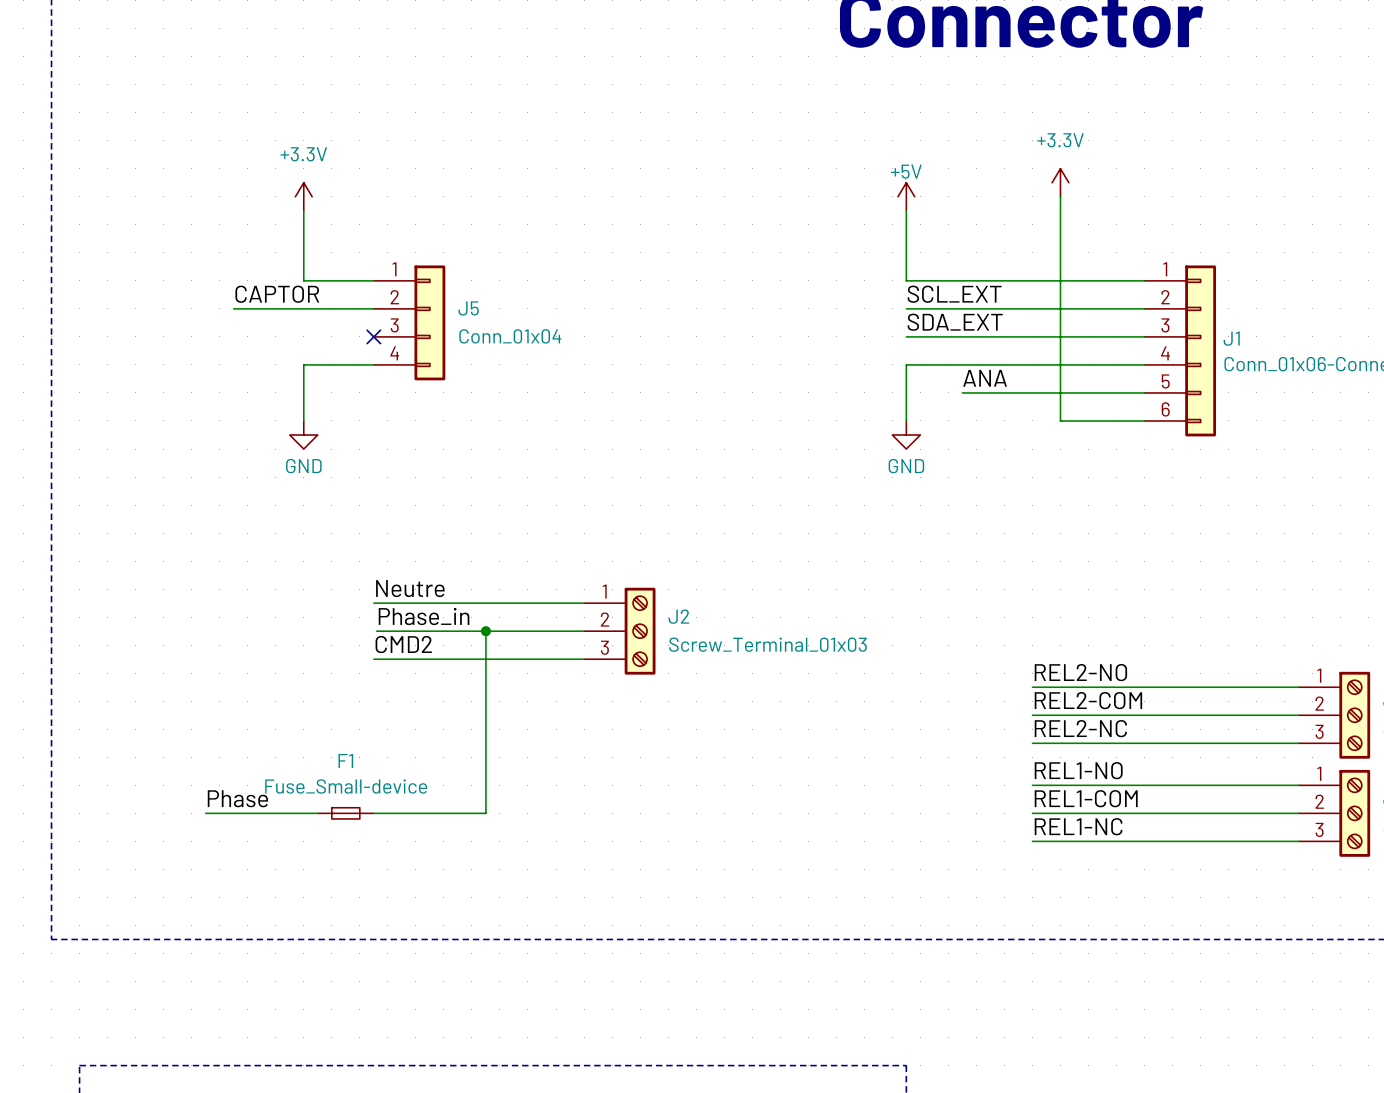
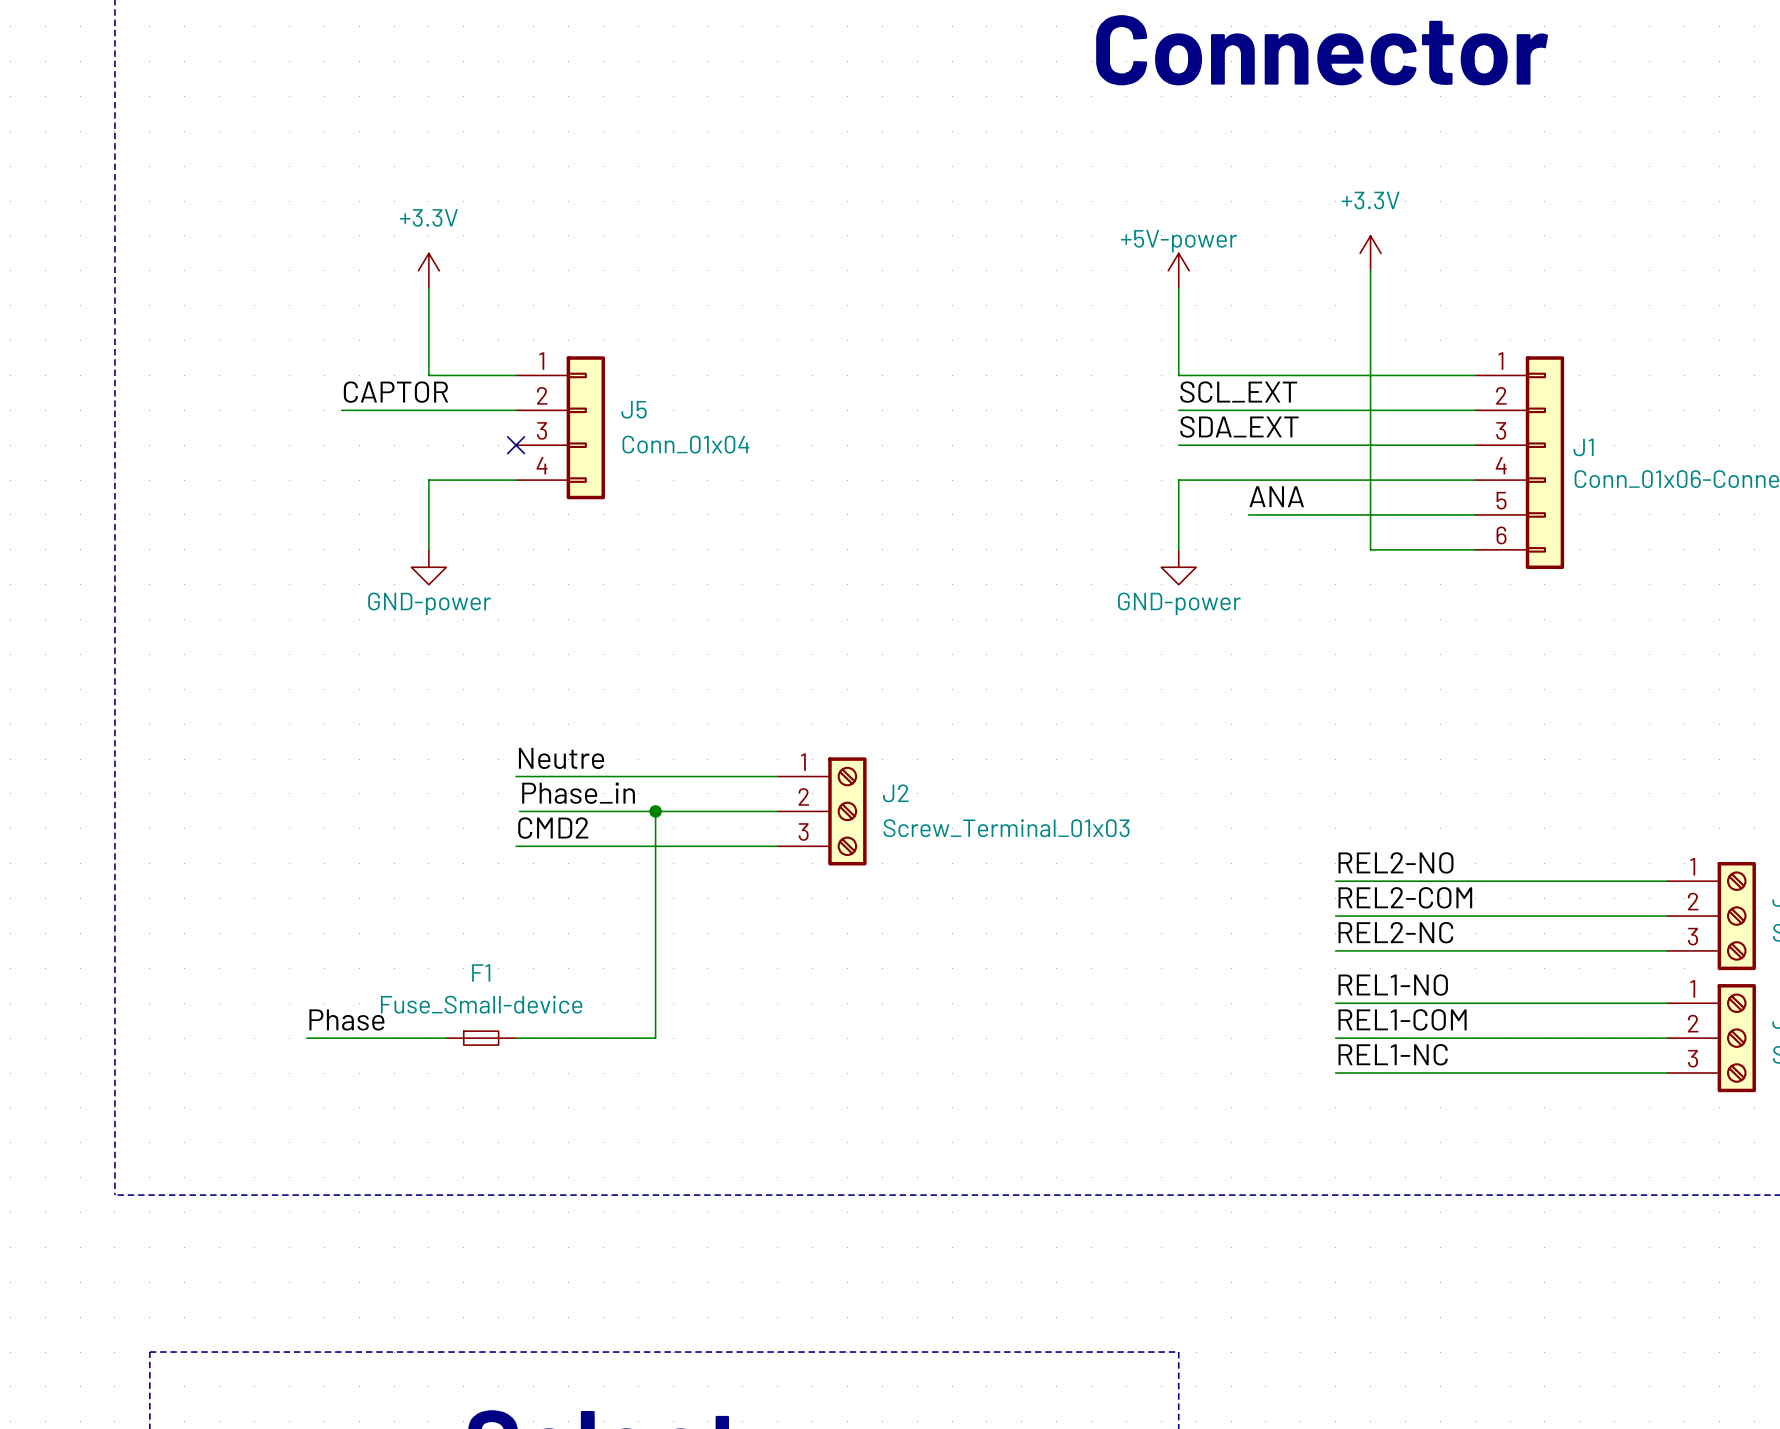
power symbol: +5V (906, 196) -> +5V-power (1178, 270)
power symbol: GND (303, 435) -> GND-power (428, 567)
power symbol: GND (906, 435) -> GND-power (1178, 567)

